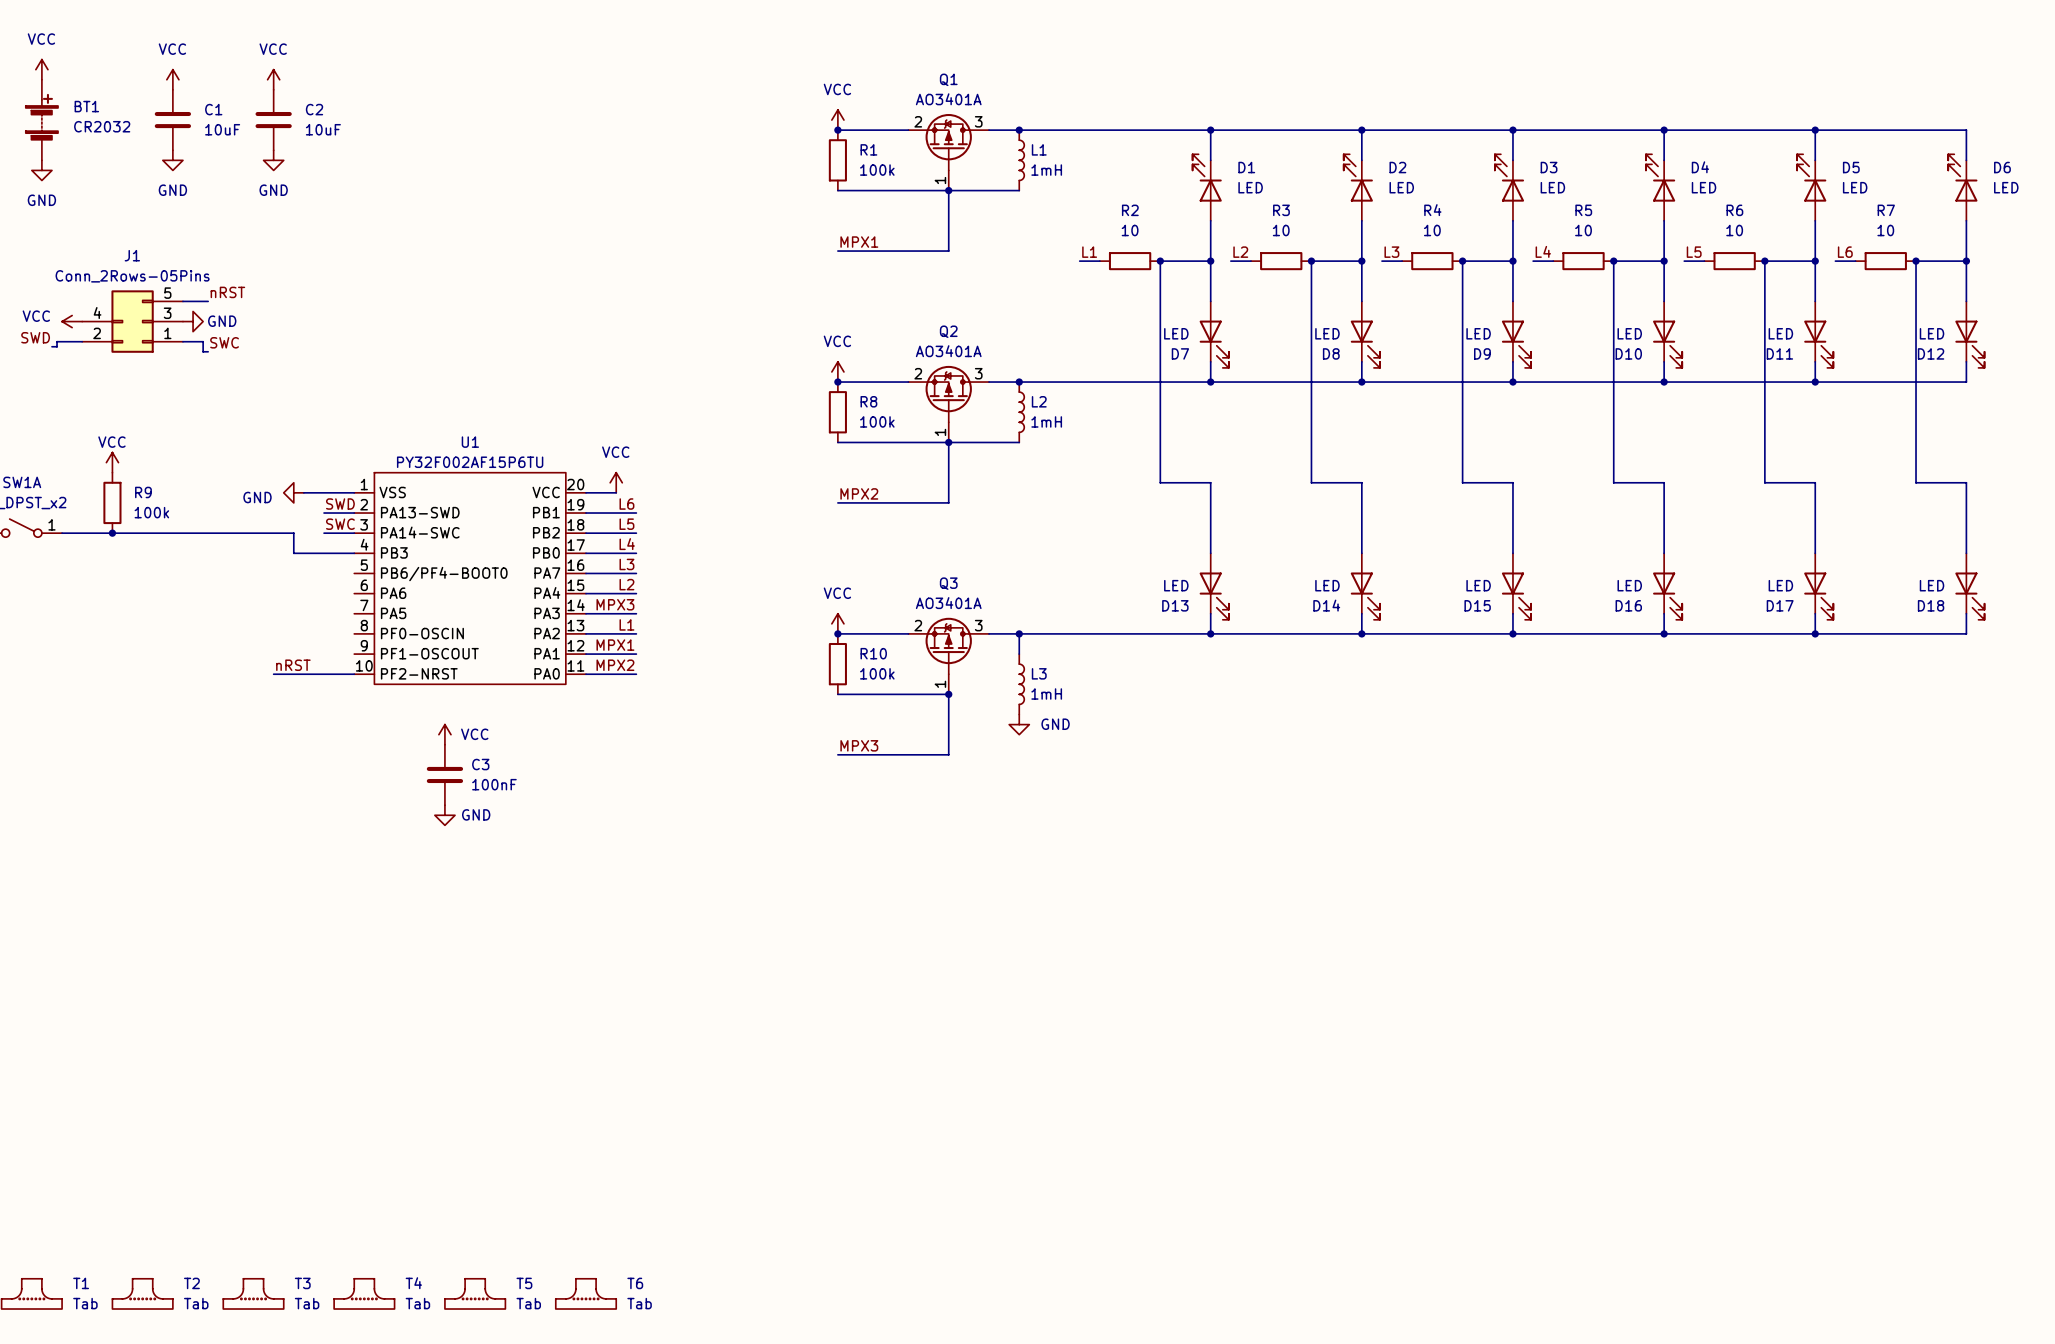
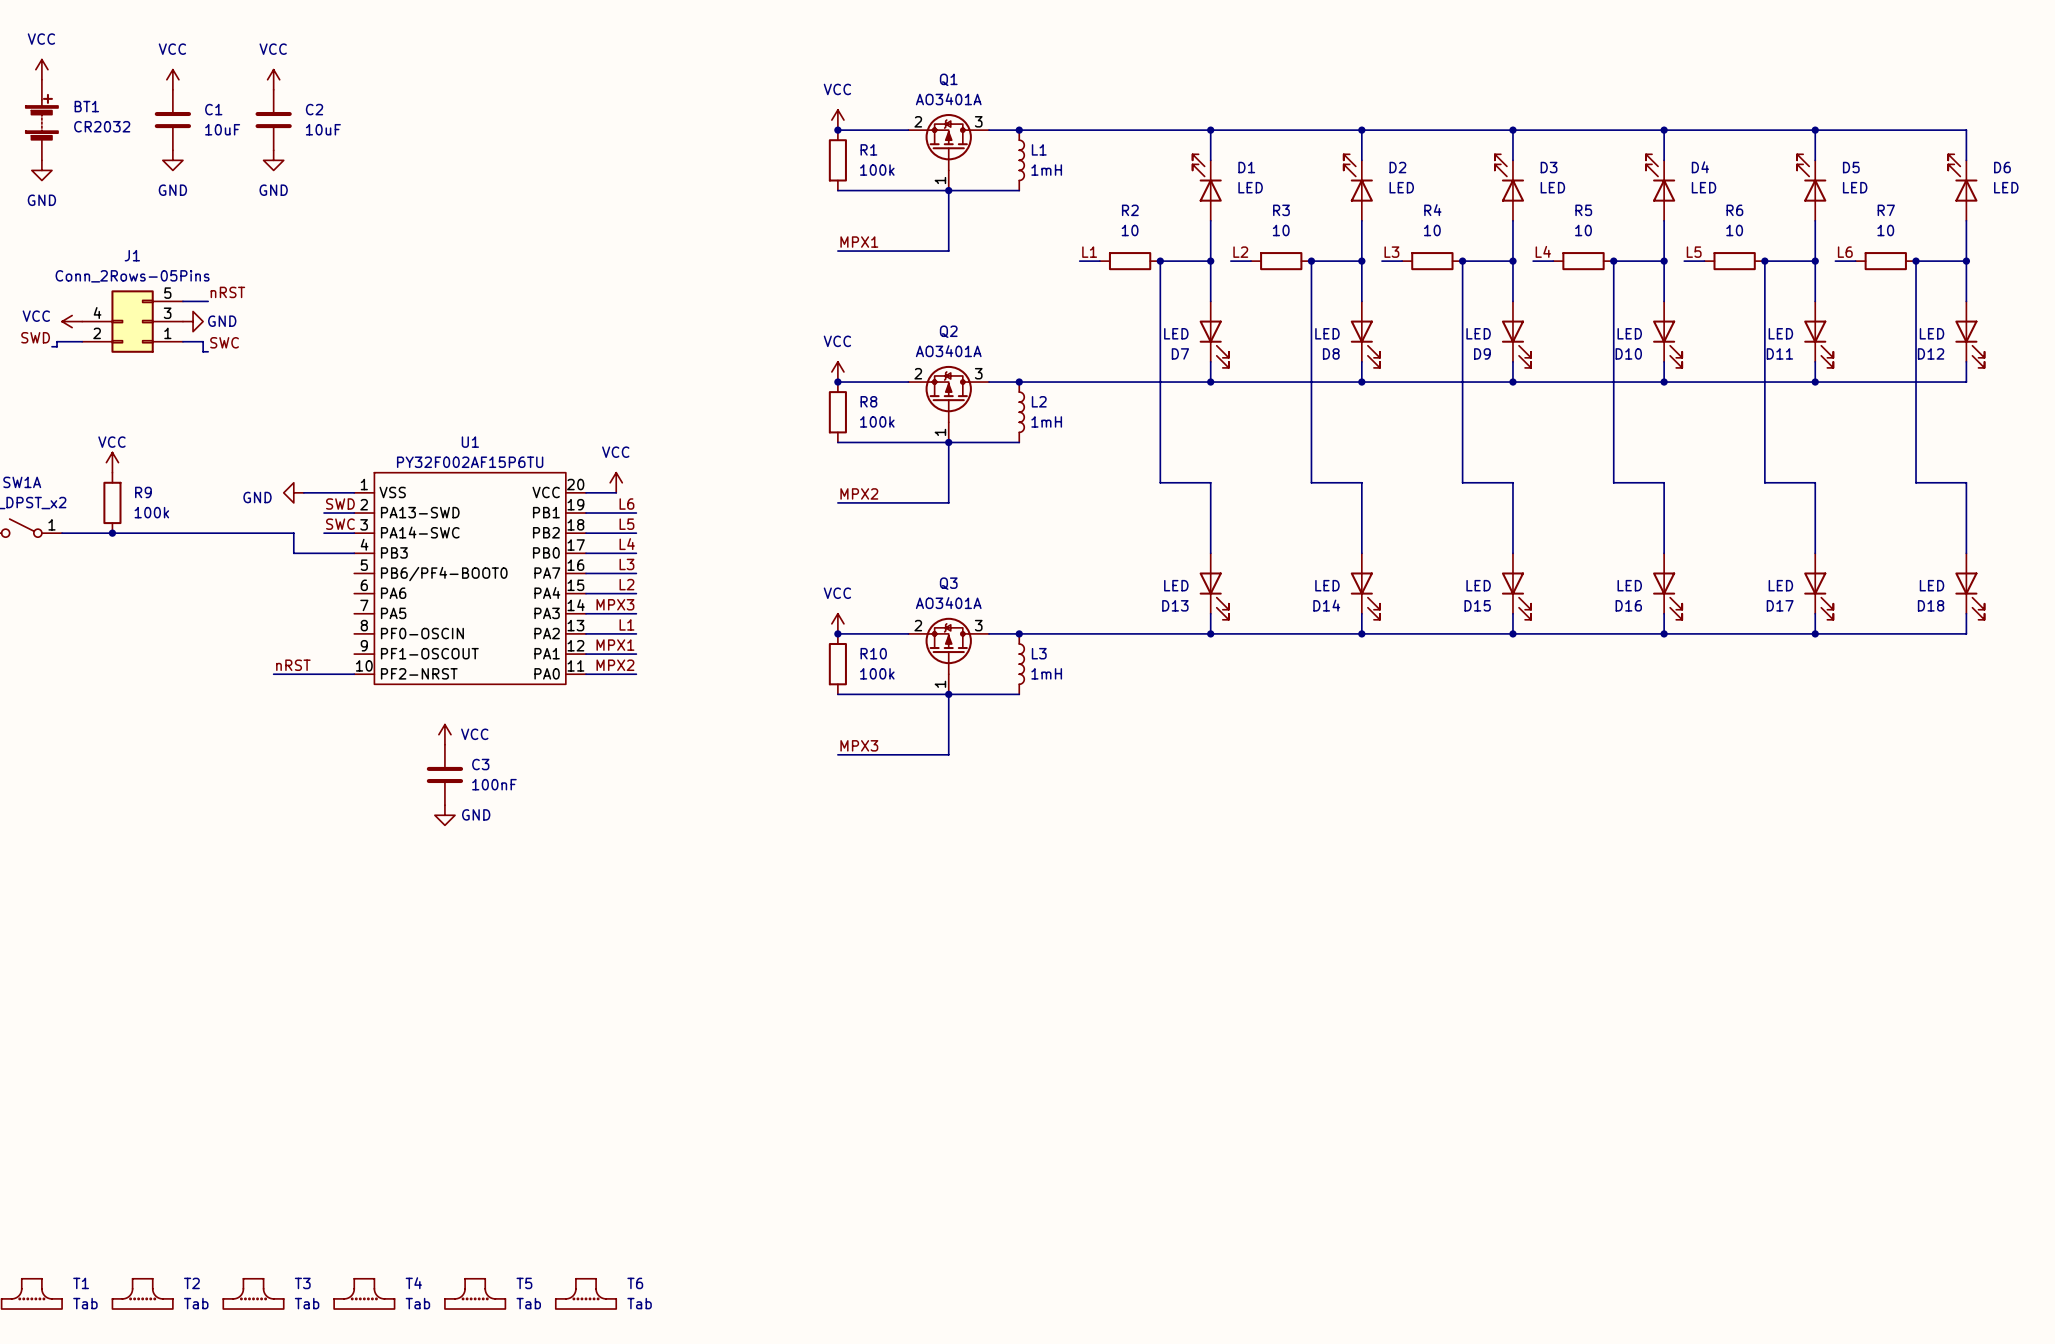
L3 position: (1021, 684) -> (1021, 664)
wire: none -> (948, 694) (1019, 694)
power symbol: GND (1019, 724) -> none

